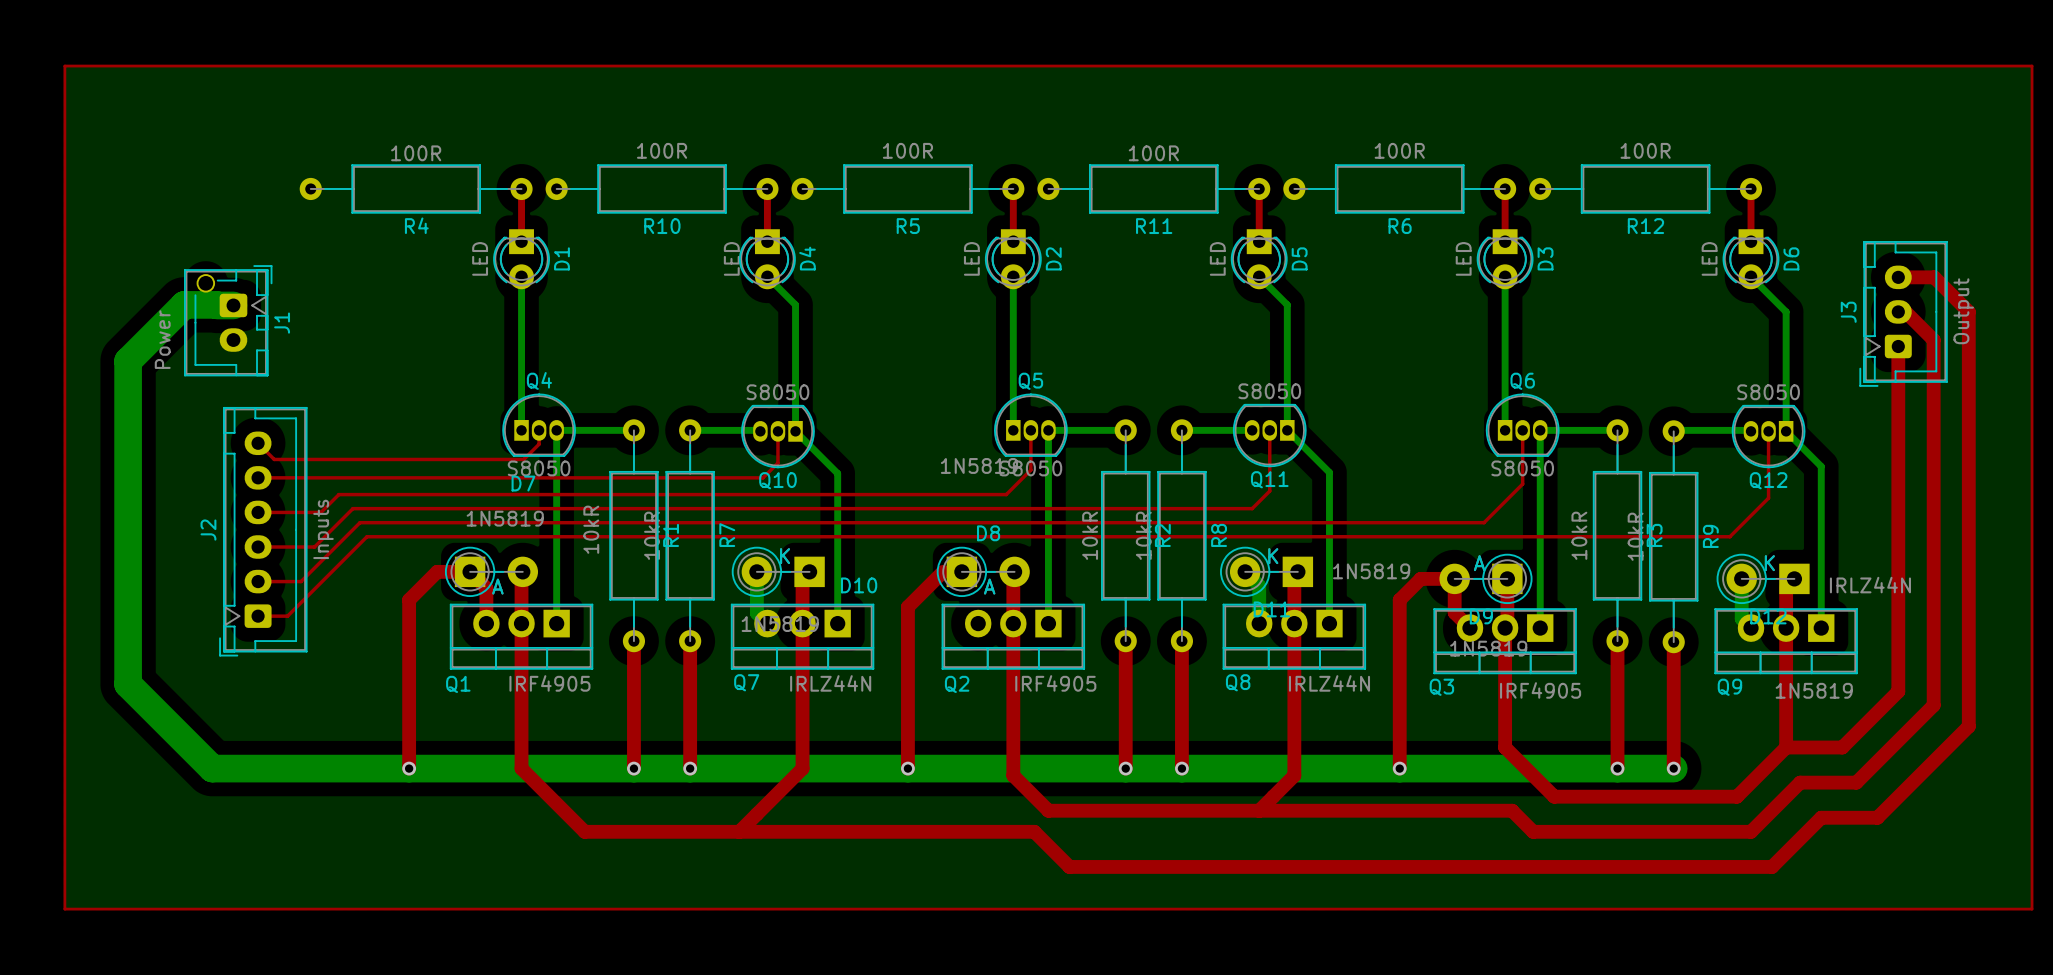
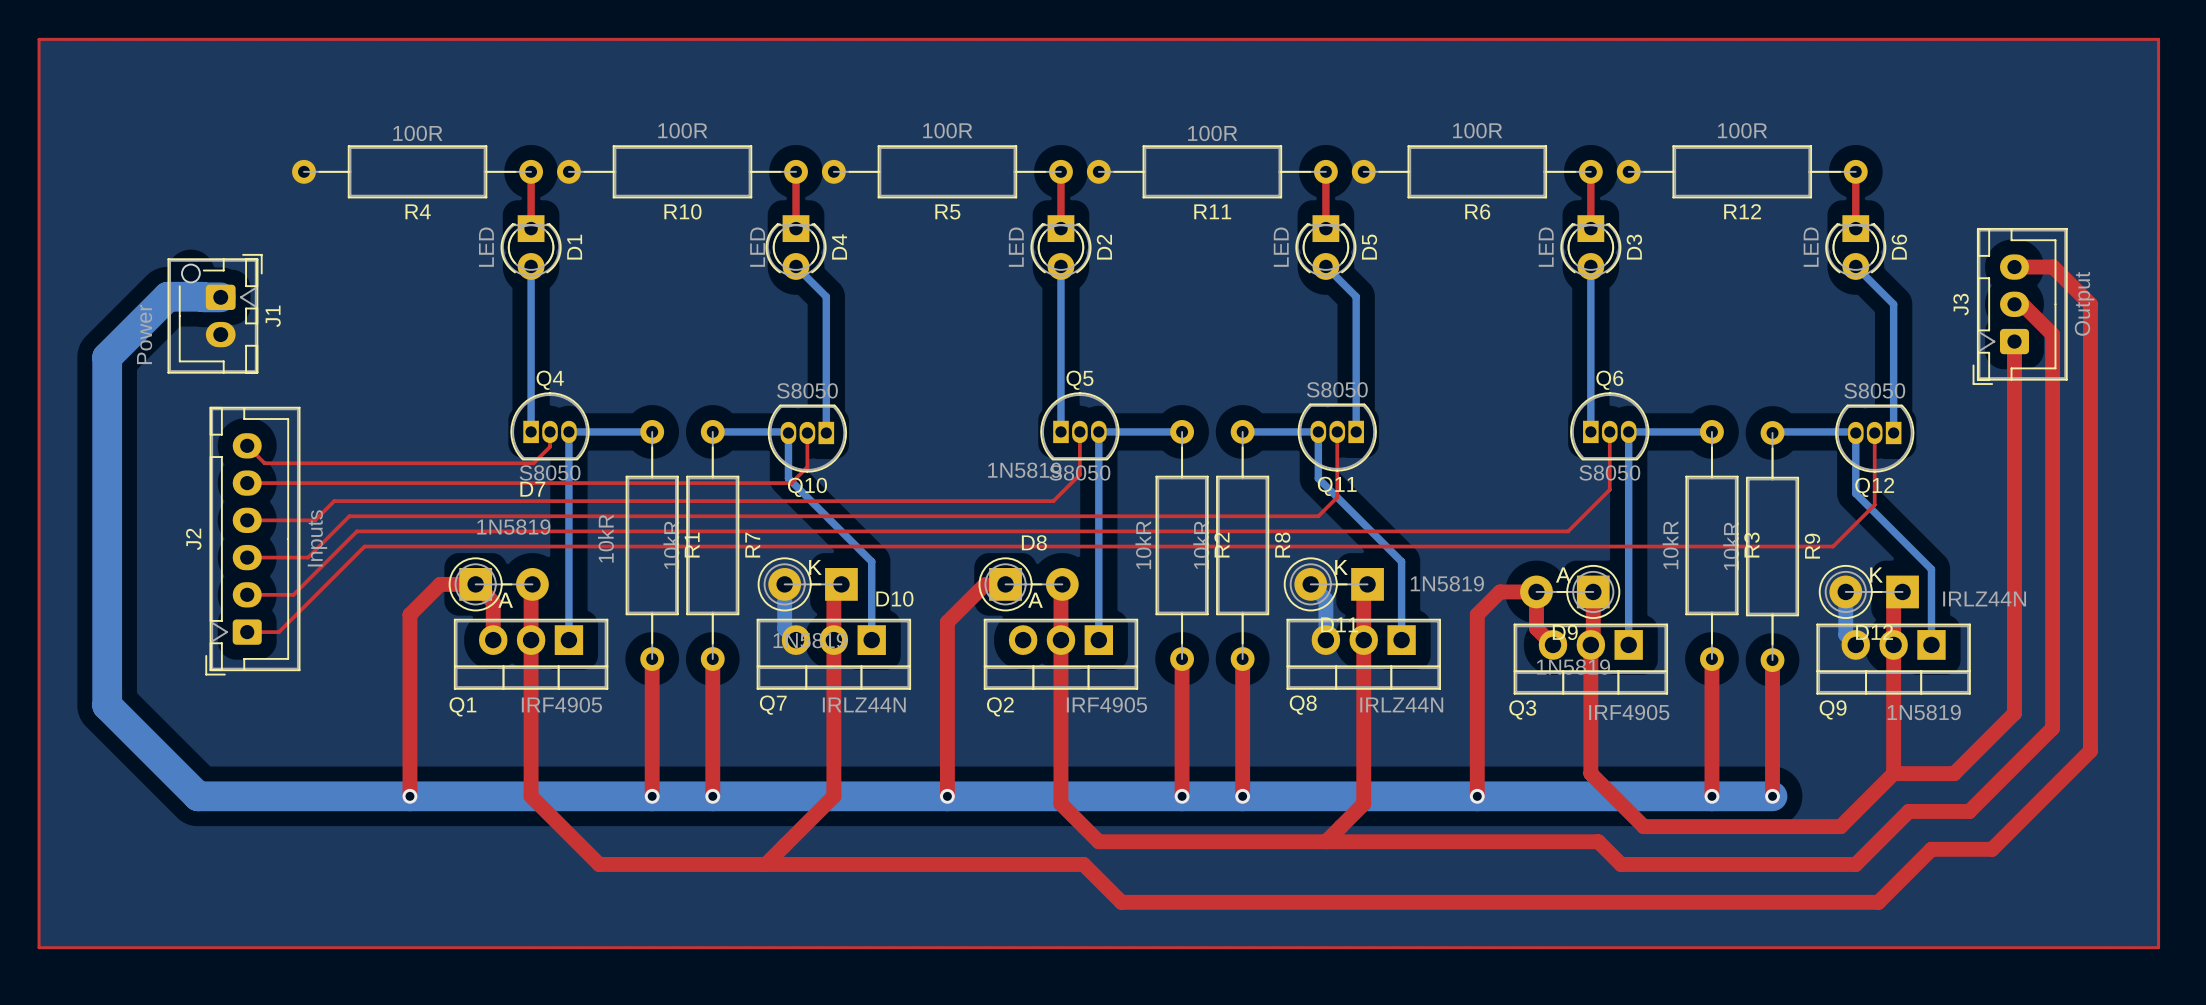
bottom track: (1287, 430) (1329, 472) (1329, 550) -> (1318, 431) (1318, 478) (1401, 561)
bottom track: (795, 431) (837, 473) (837, 550) -> (788, 432) (788, 478) (871, 561)
bottom track: (1786, 431) (1821, 466) (1821, 557) -> (1855, 432) (1855, 493) (1931, 569)

